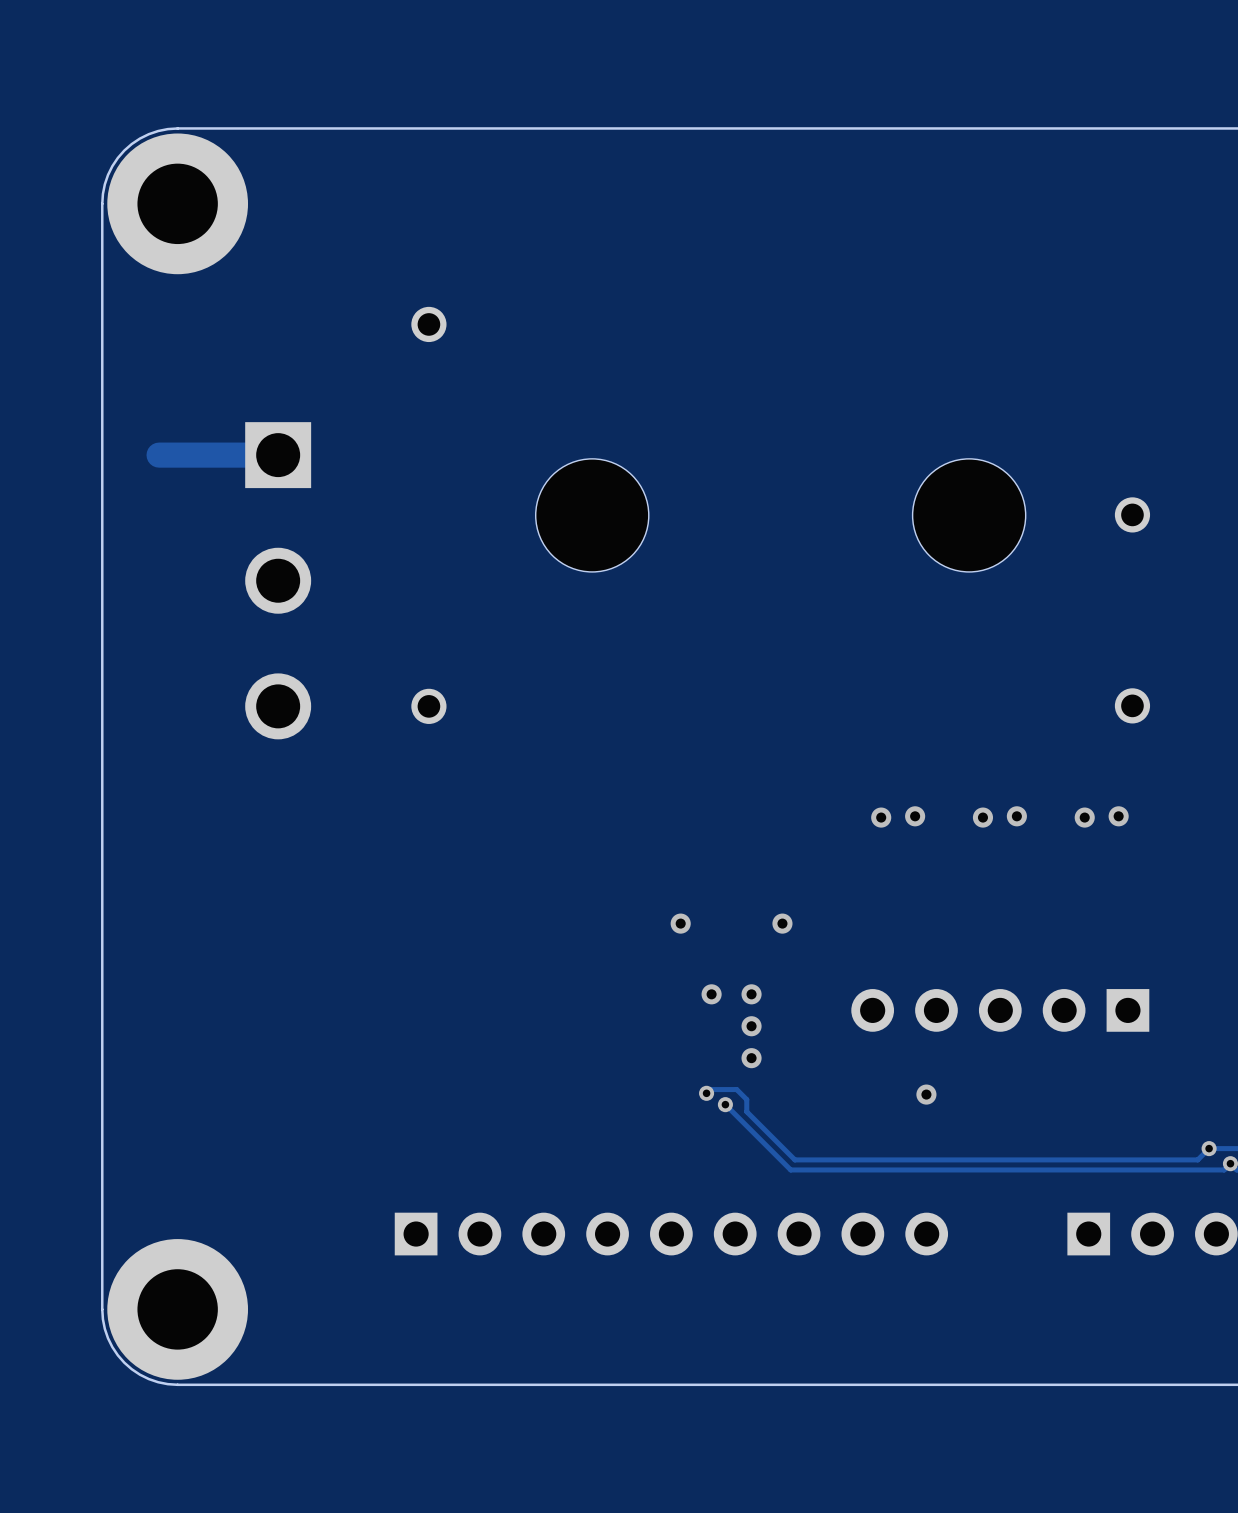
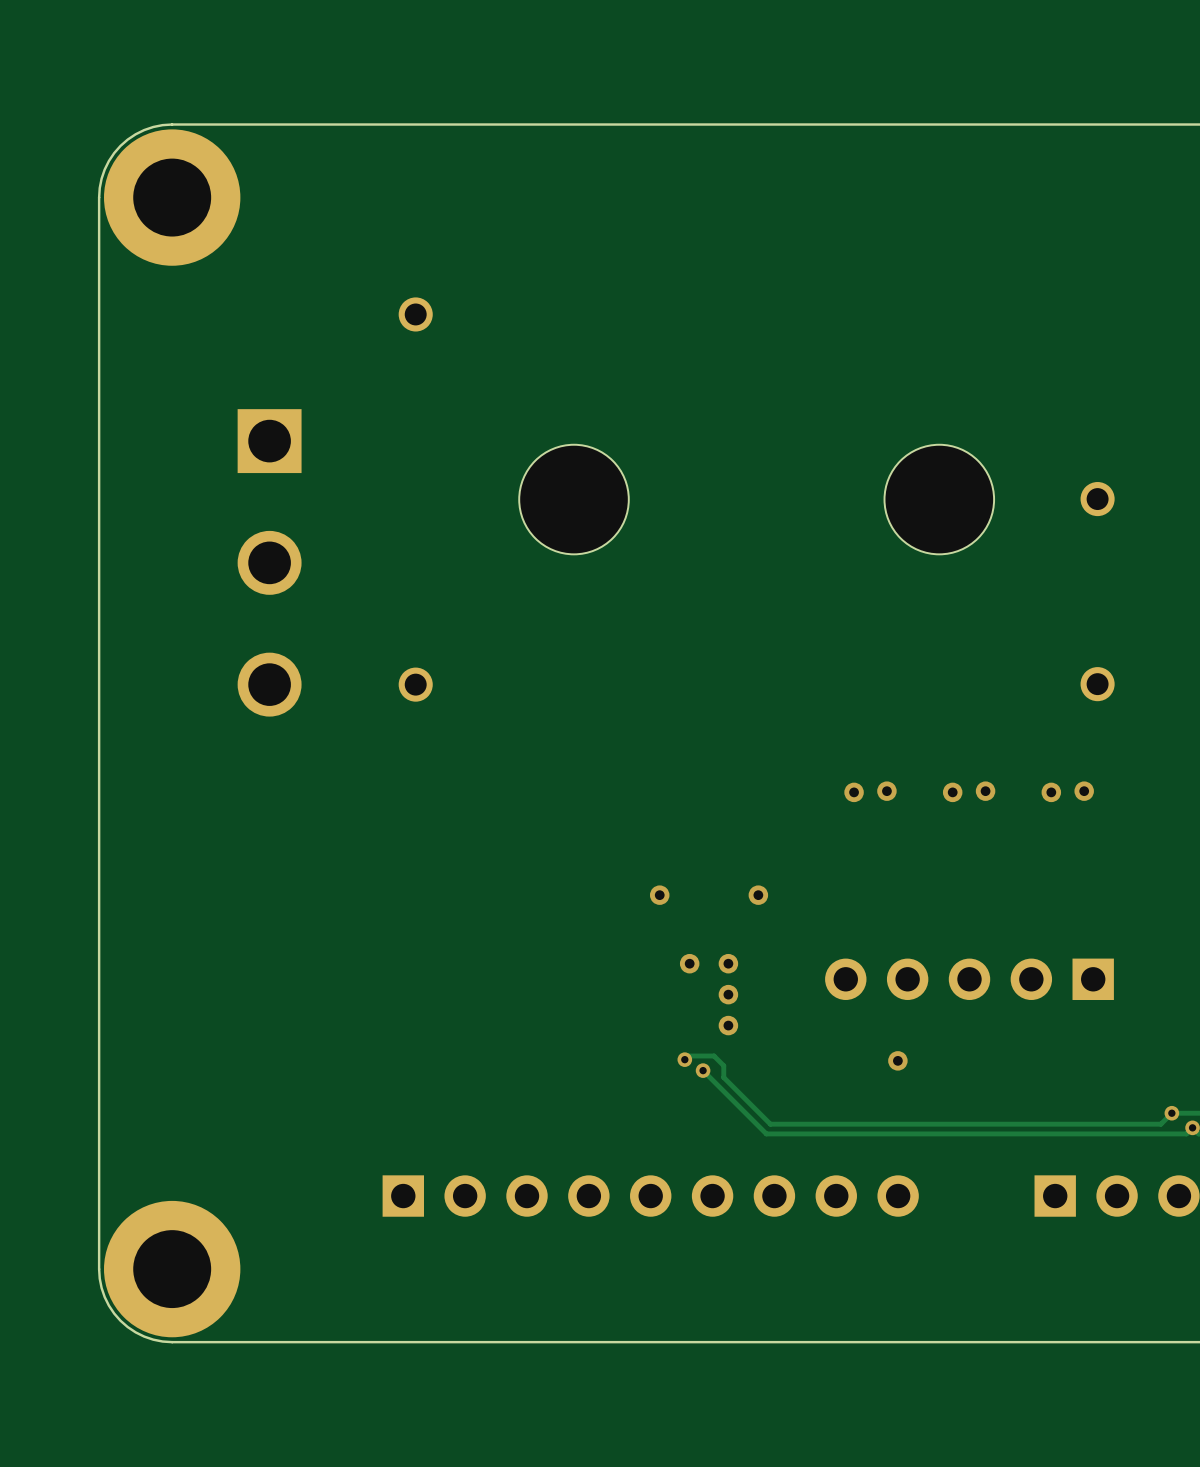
track: (278, 455) (159, 455) -> none

